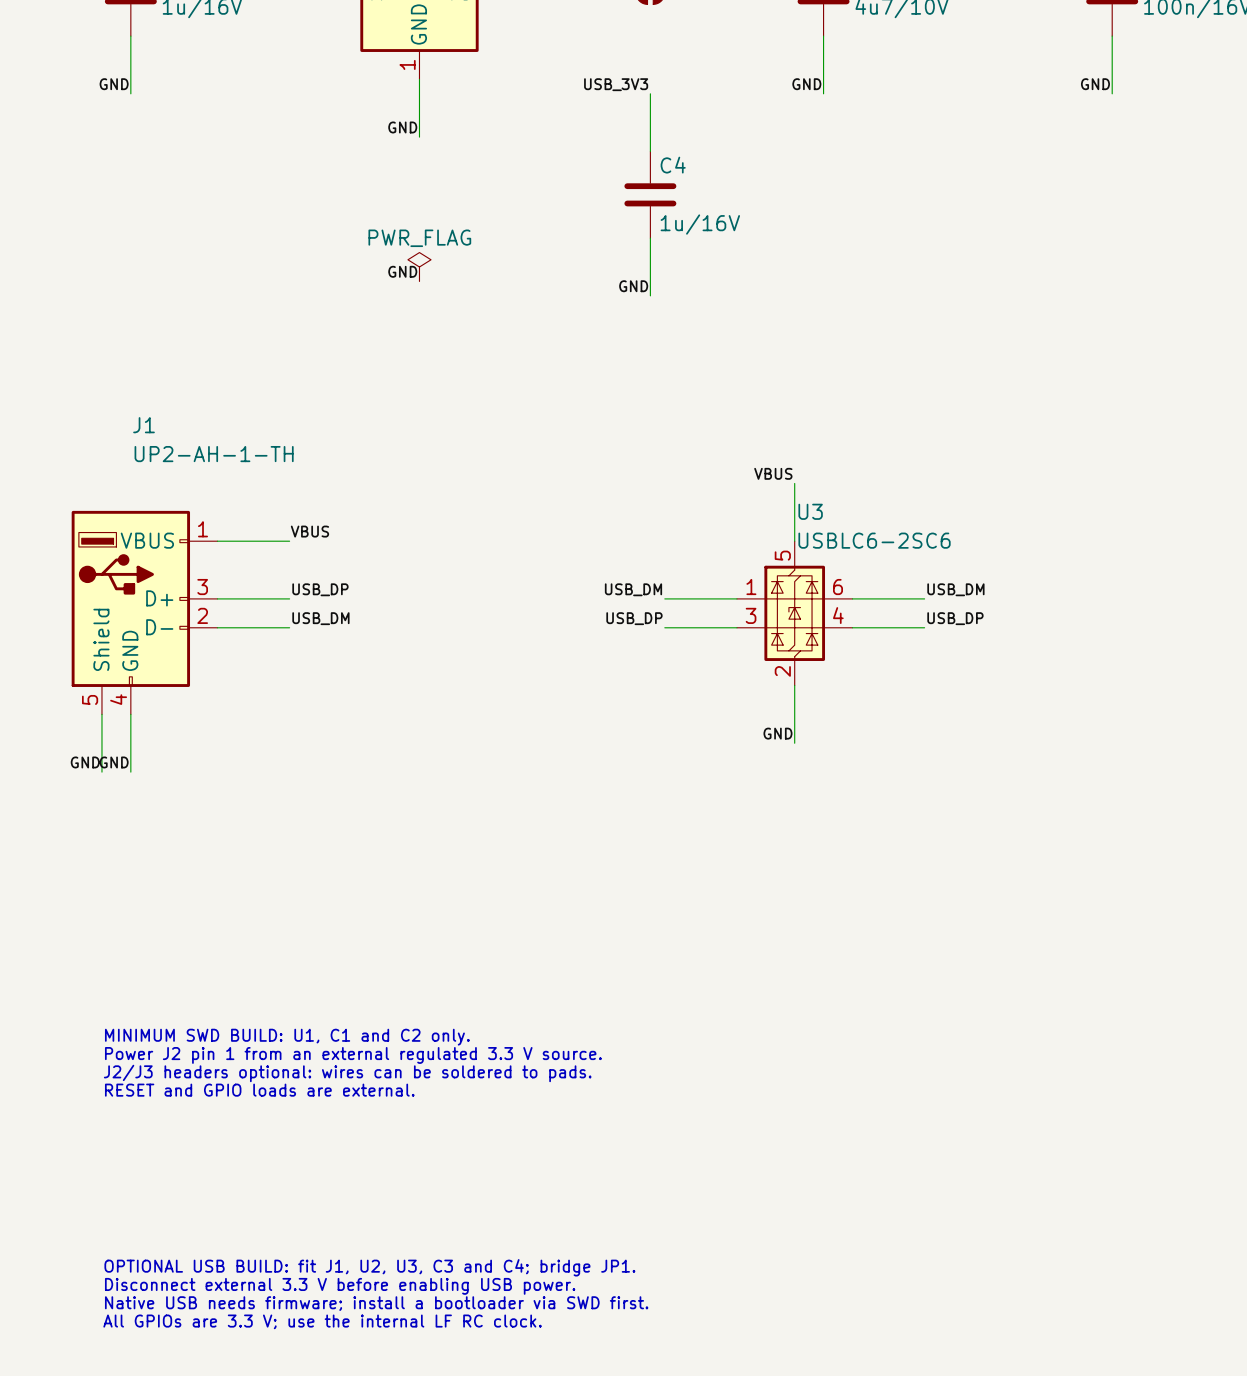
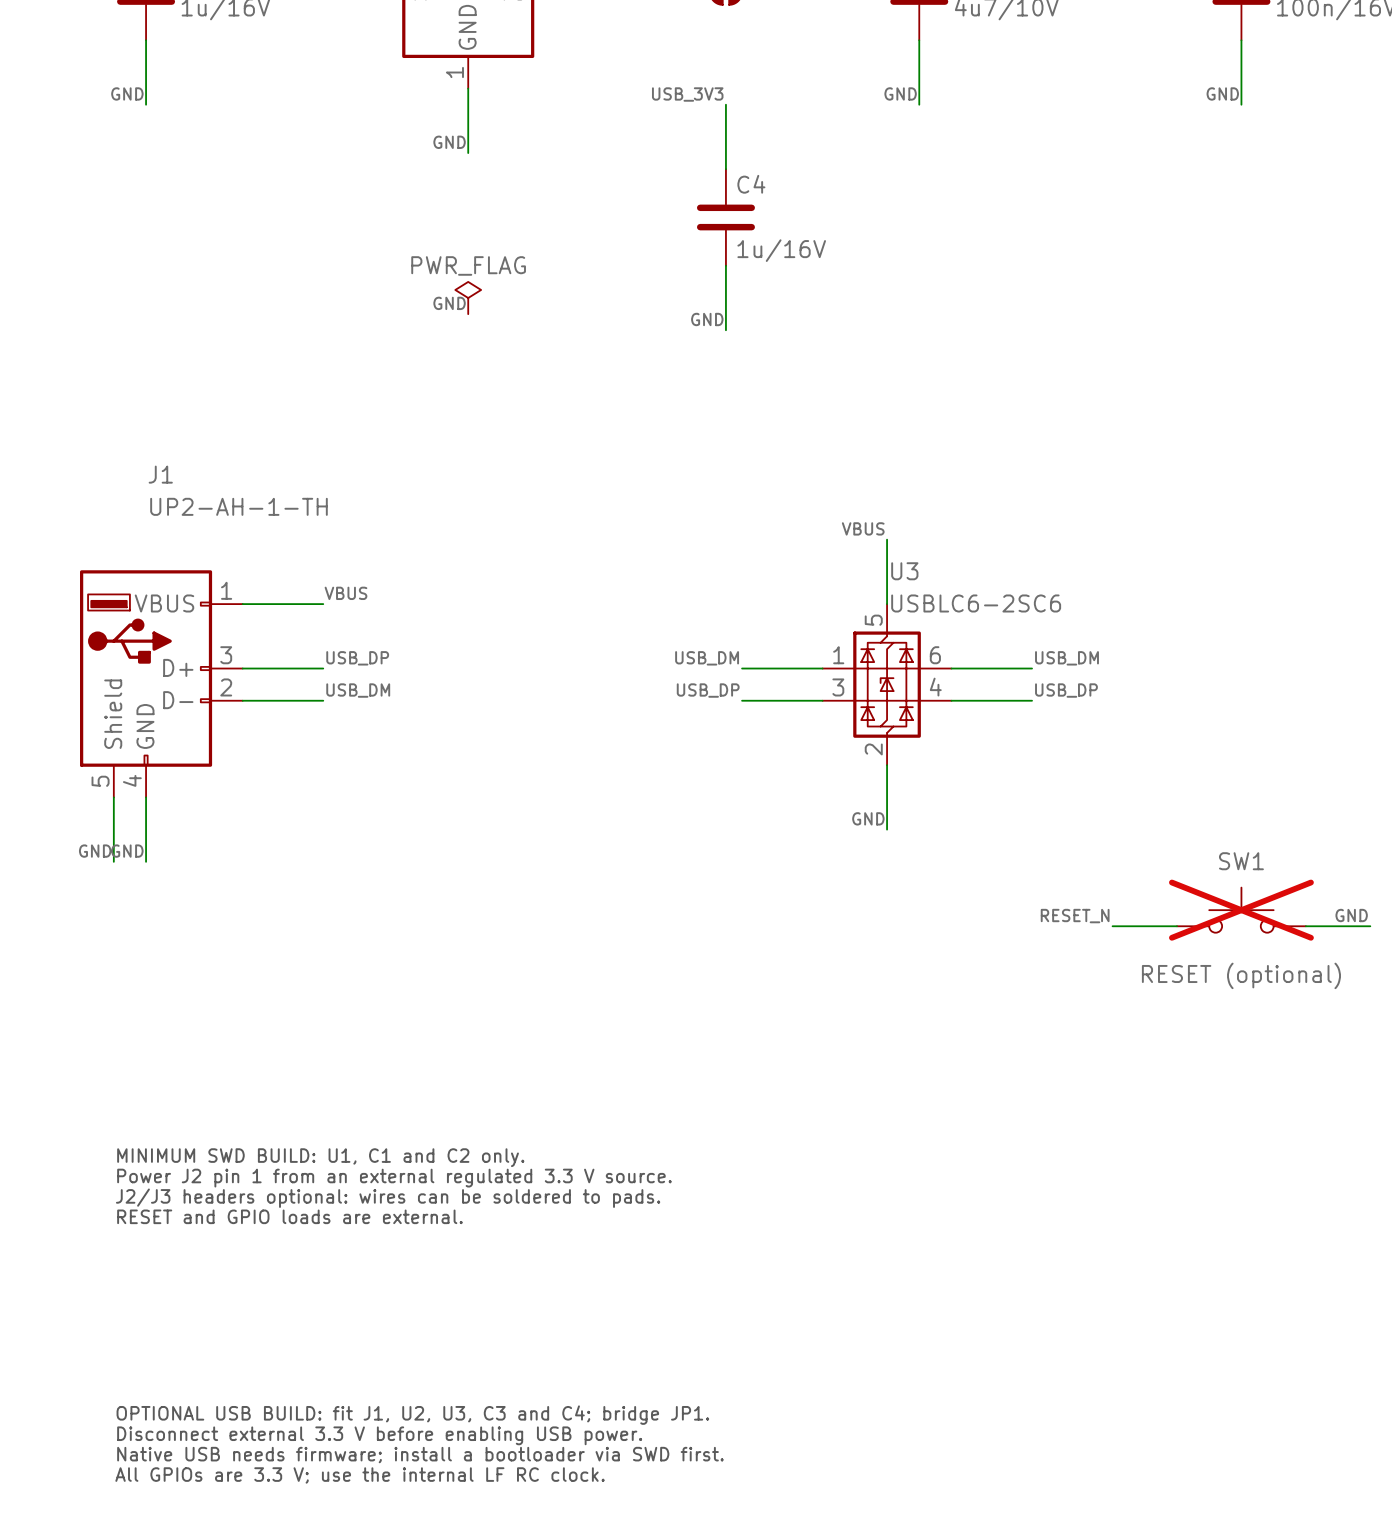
SW1: none -> RESET (optional) (1241, 910)
label: none -> RESET_N (1075, 916)
label: none -> GND (1351, 915)
wire: none -> (1112, 926) (1177, 926)
wire: none -> (1305, 926) (1370, 926)

